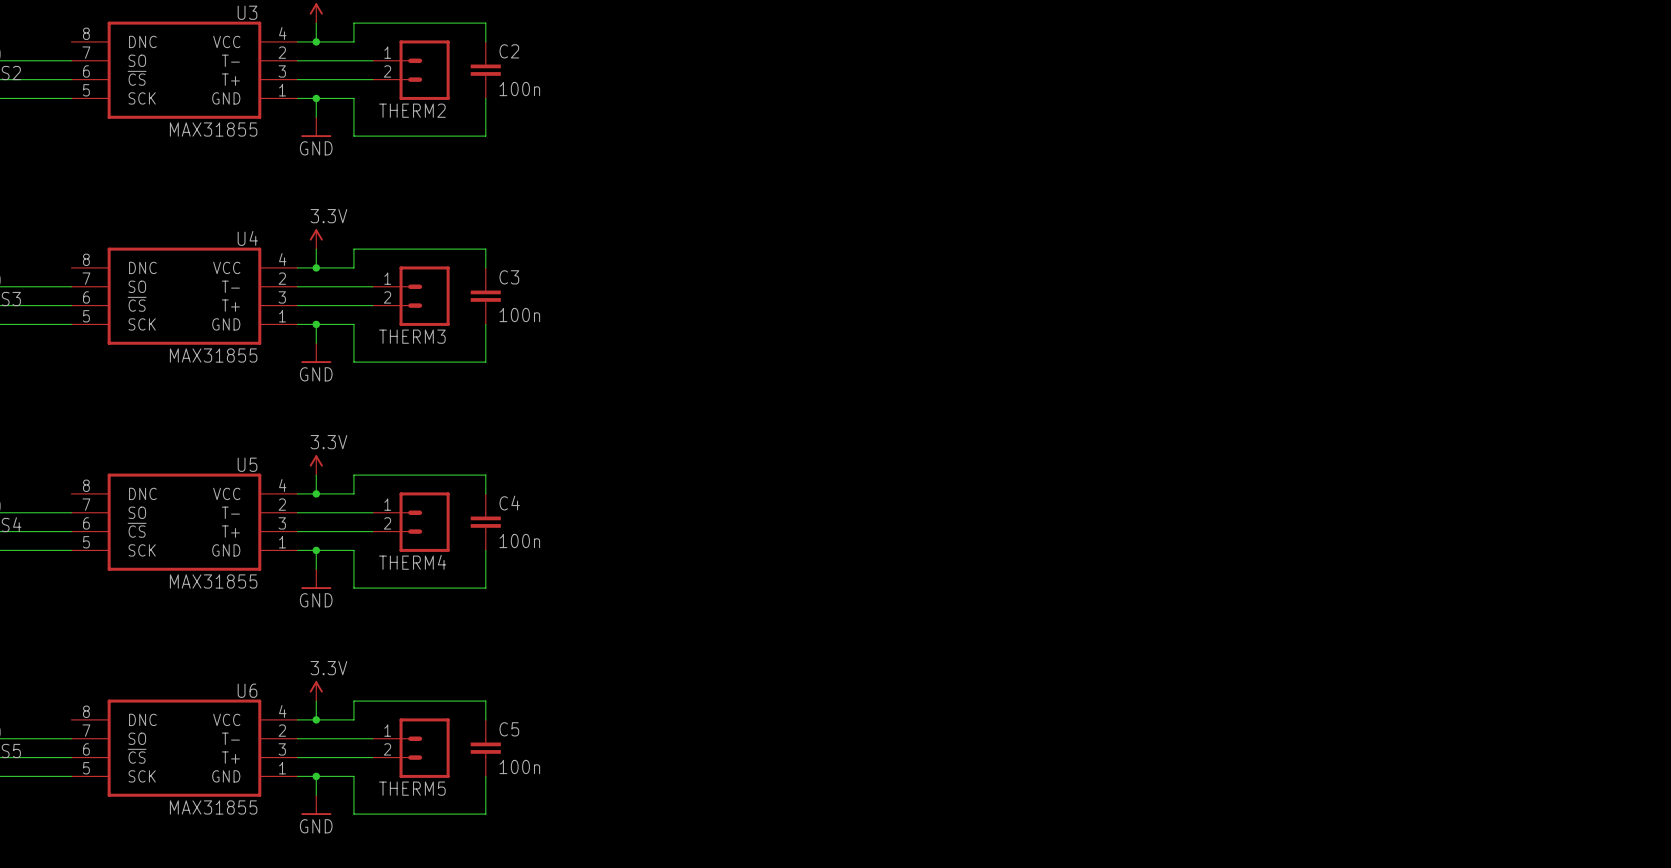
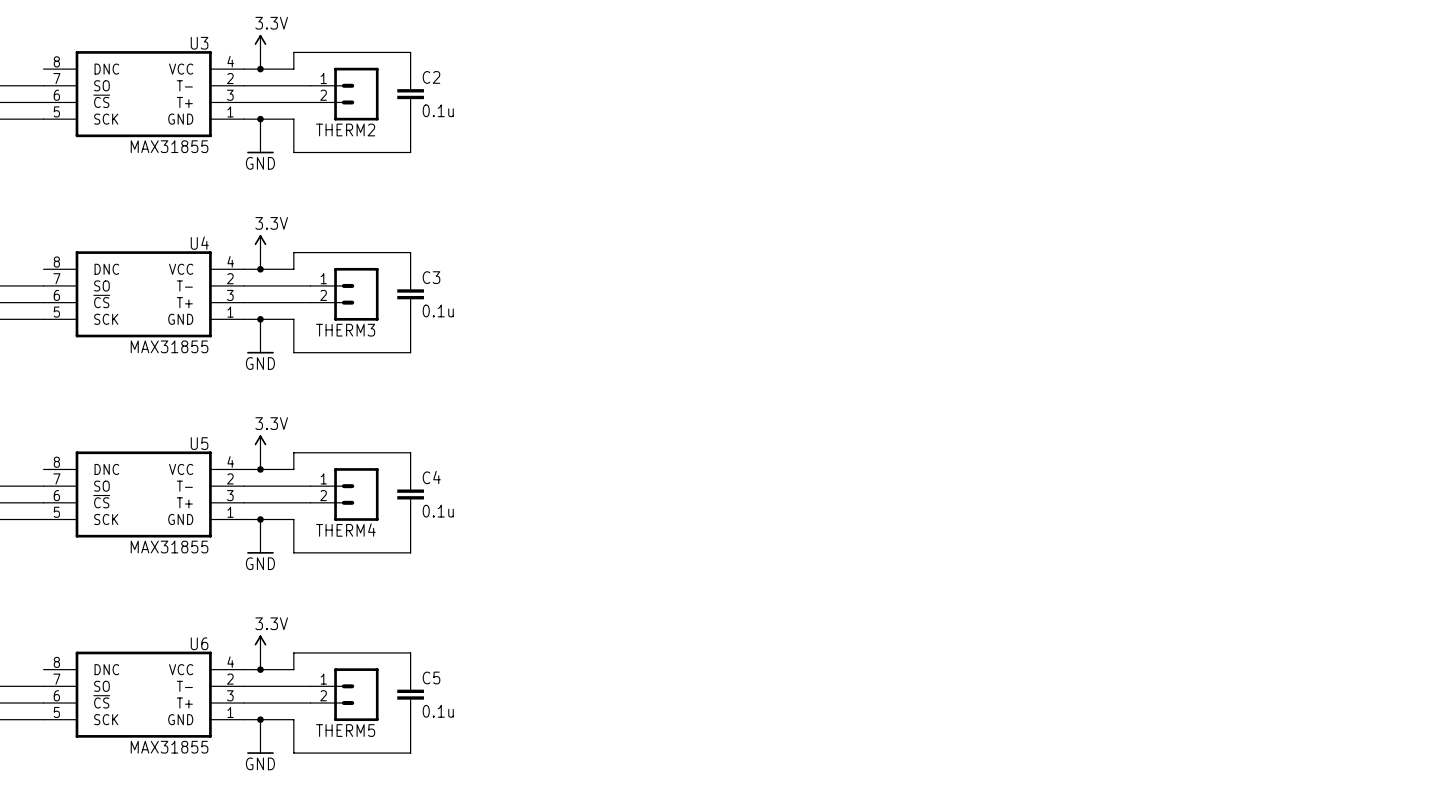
C2 value: 100n (519, 89) -> 0.1u (438, 110)
C3 value: 100n (519, 315) -> 0.1u (438, 310)
C4 value: 100n (519, 541) -> 0.1u (438, 511)
C5 value: 100n (519, 766) -> 0.1u (438, 711)

